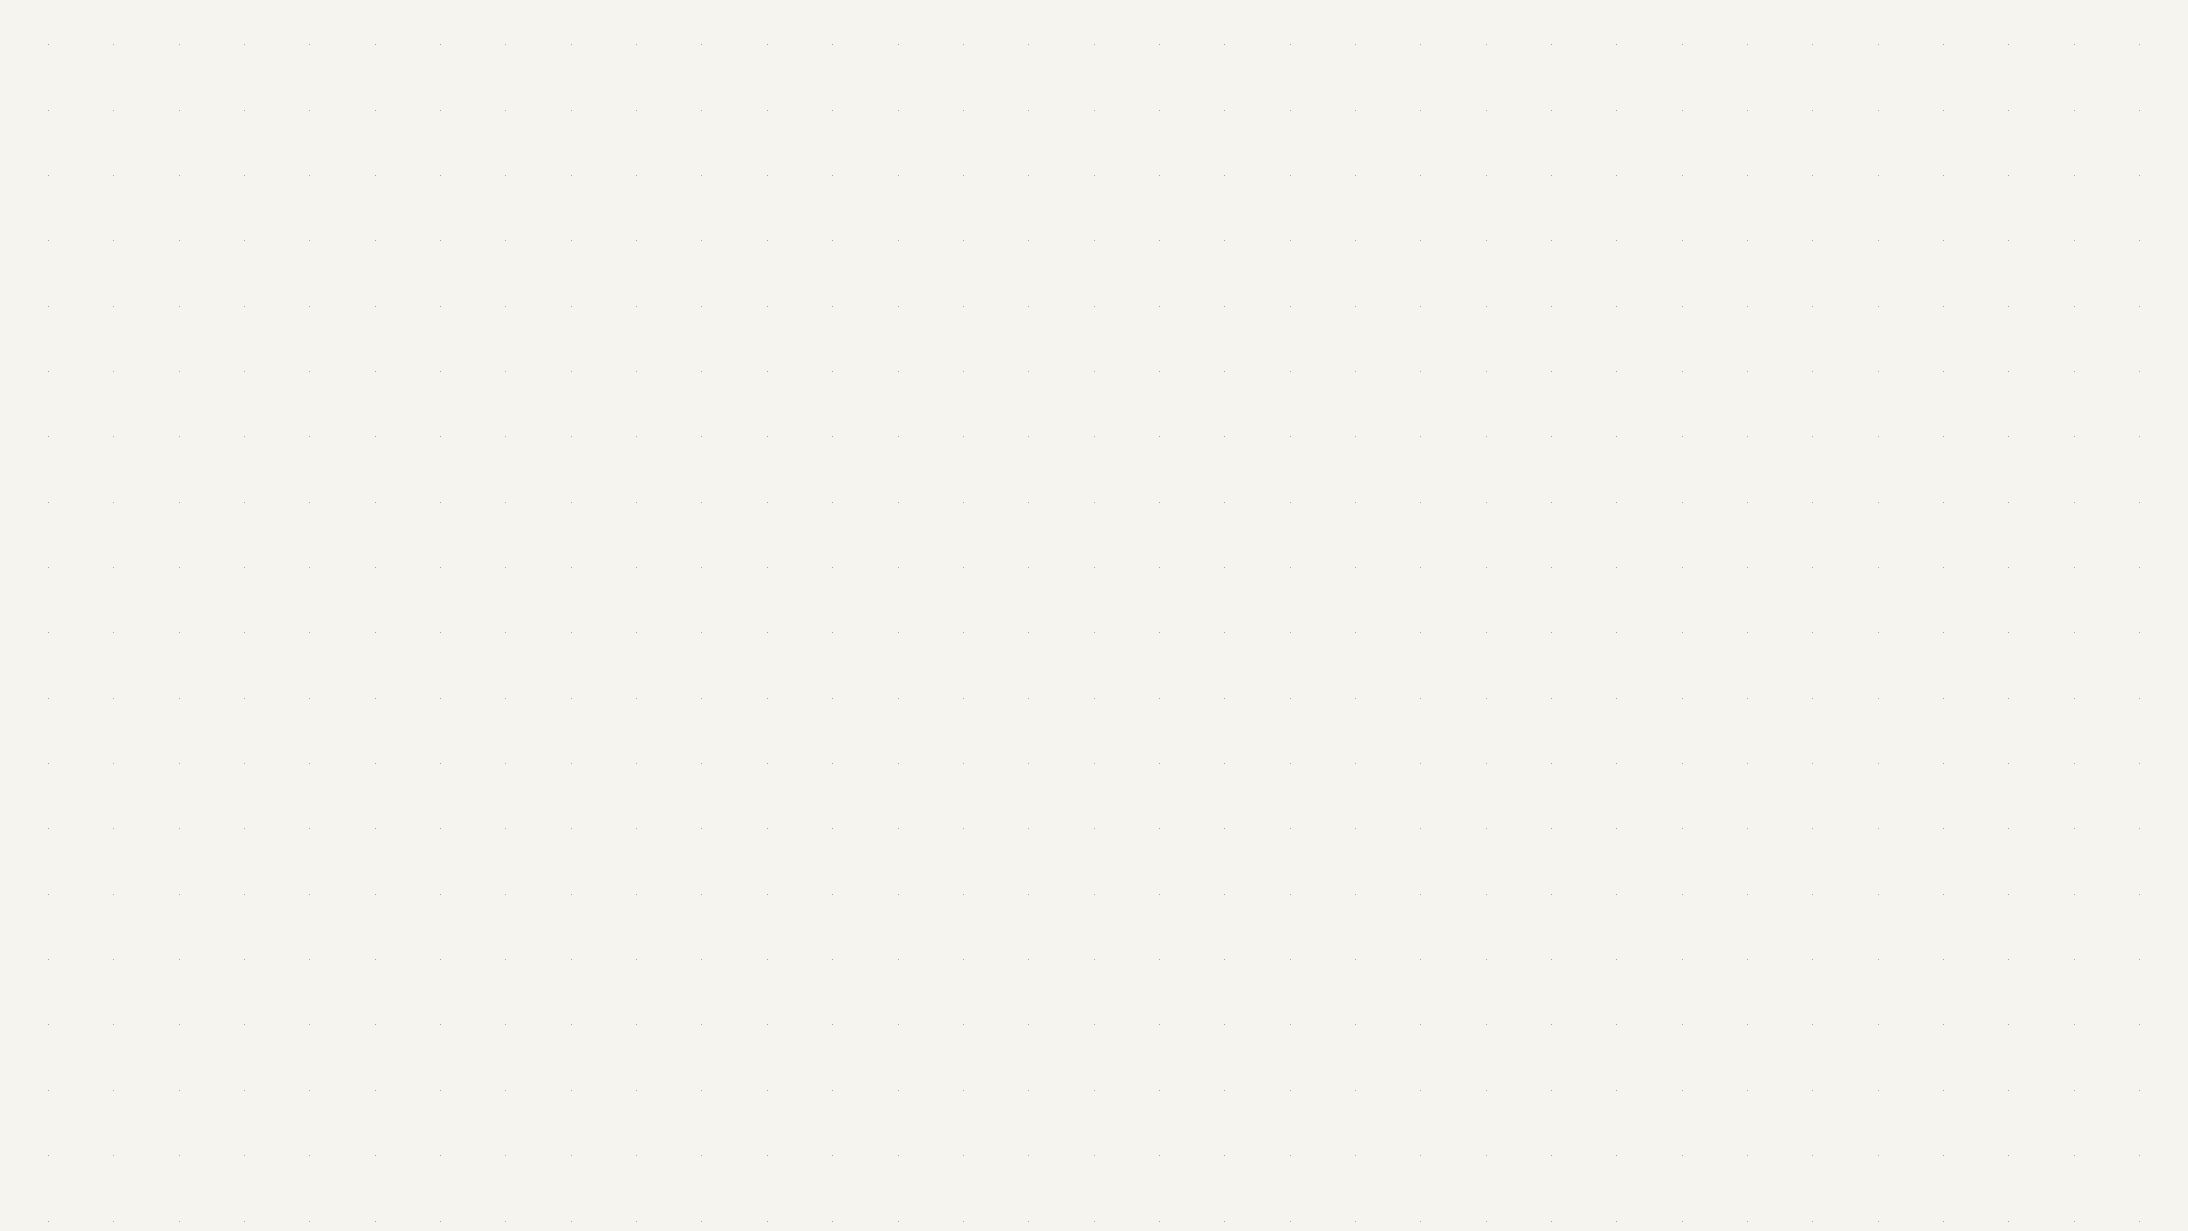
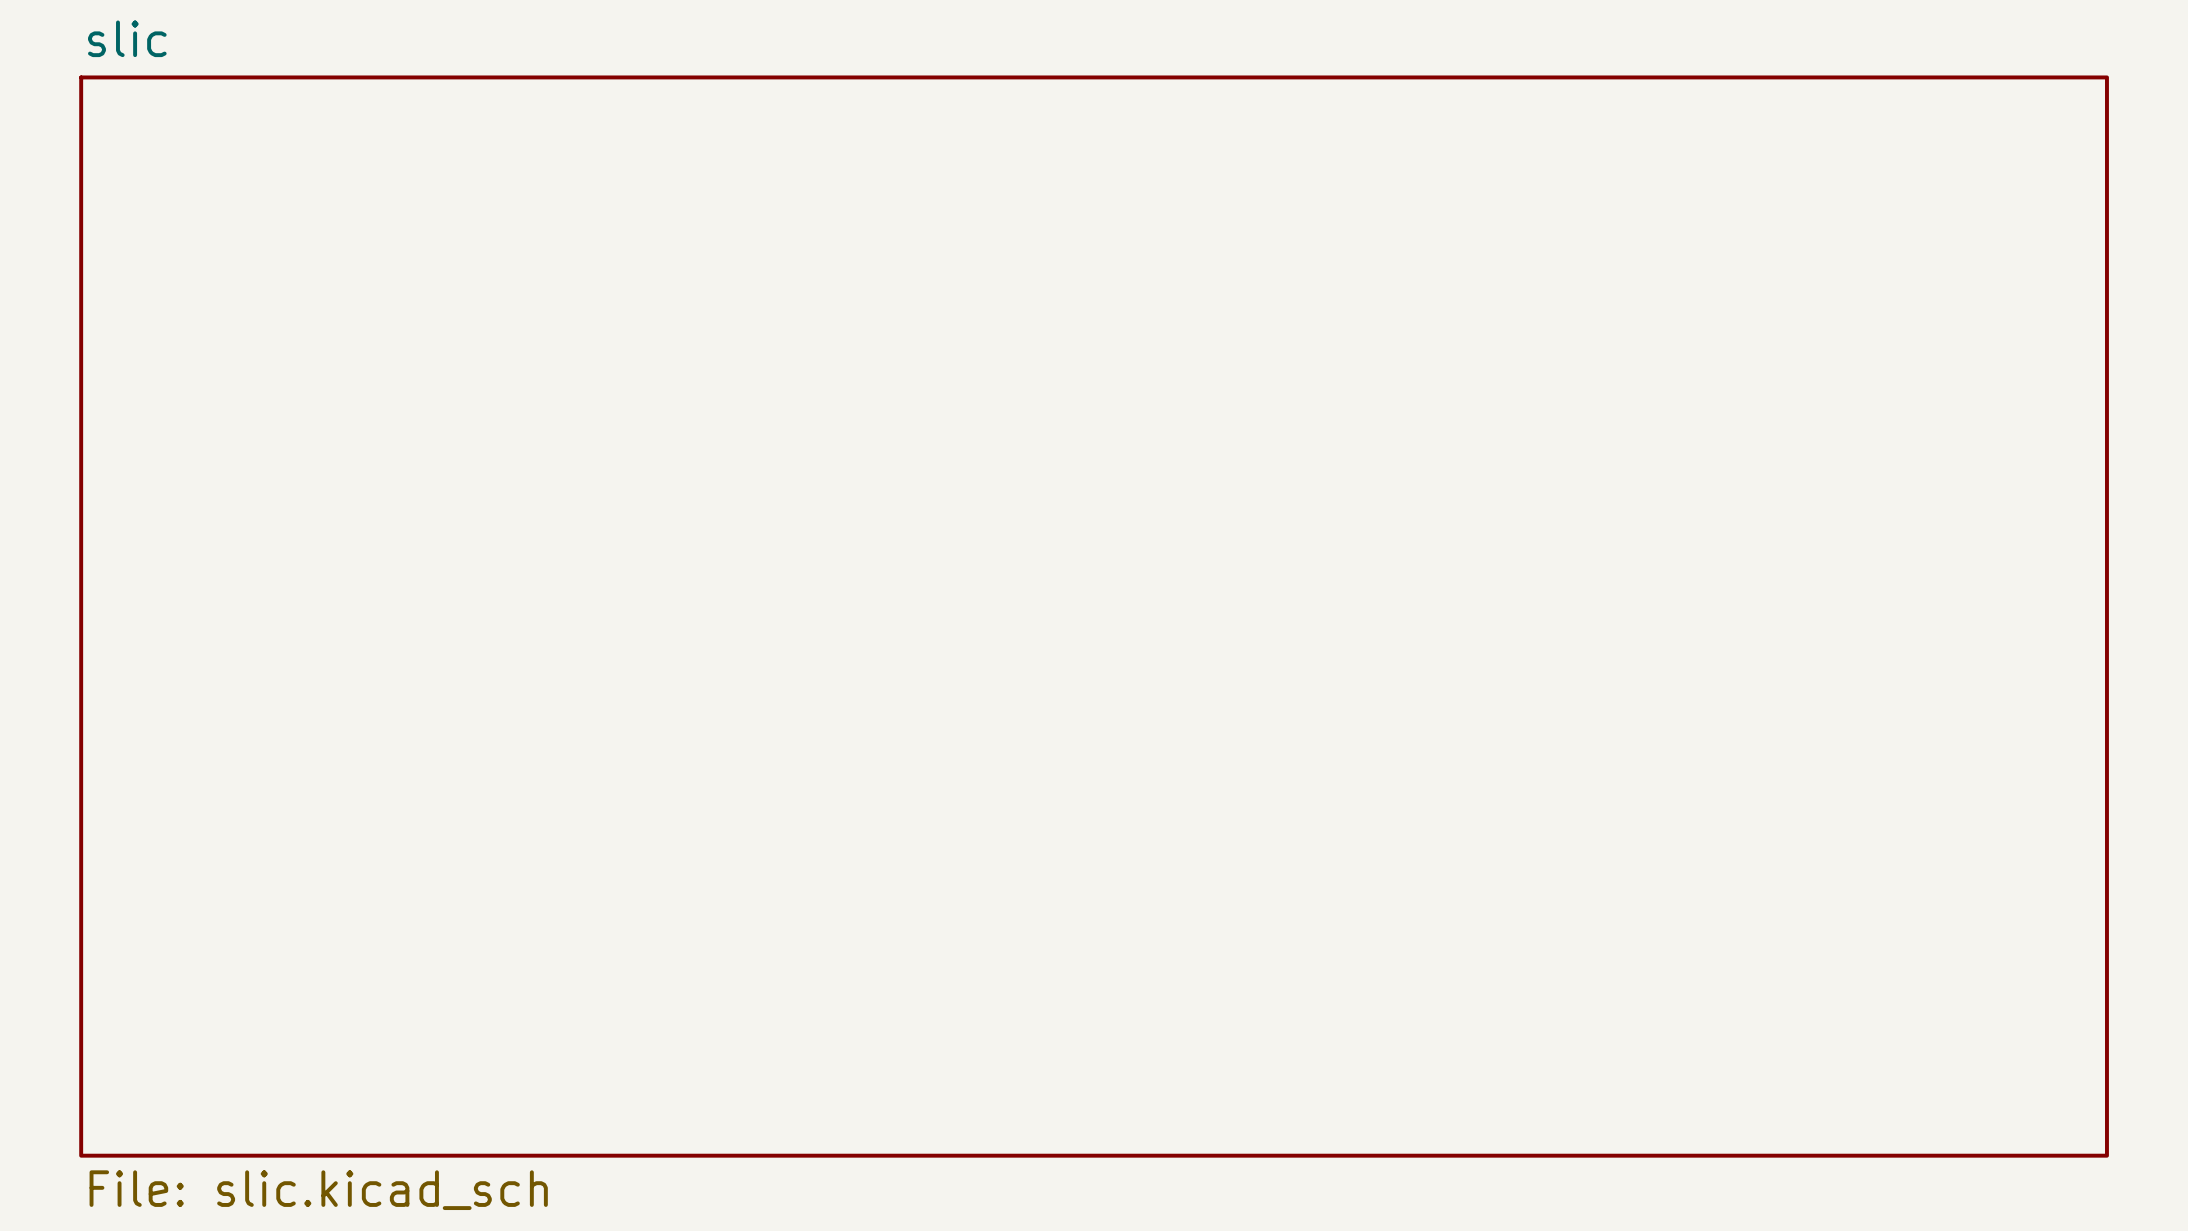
sheet slic: none -> File: slic.kicad_sch (1094, 616)

